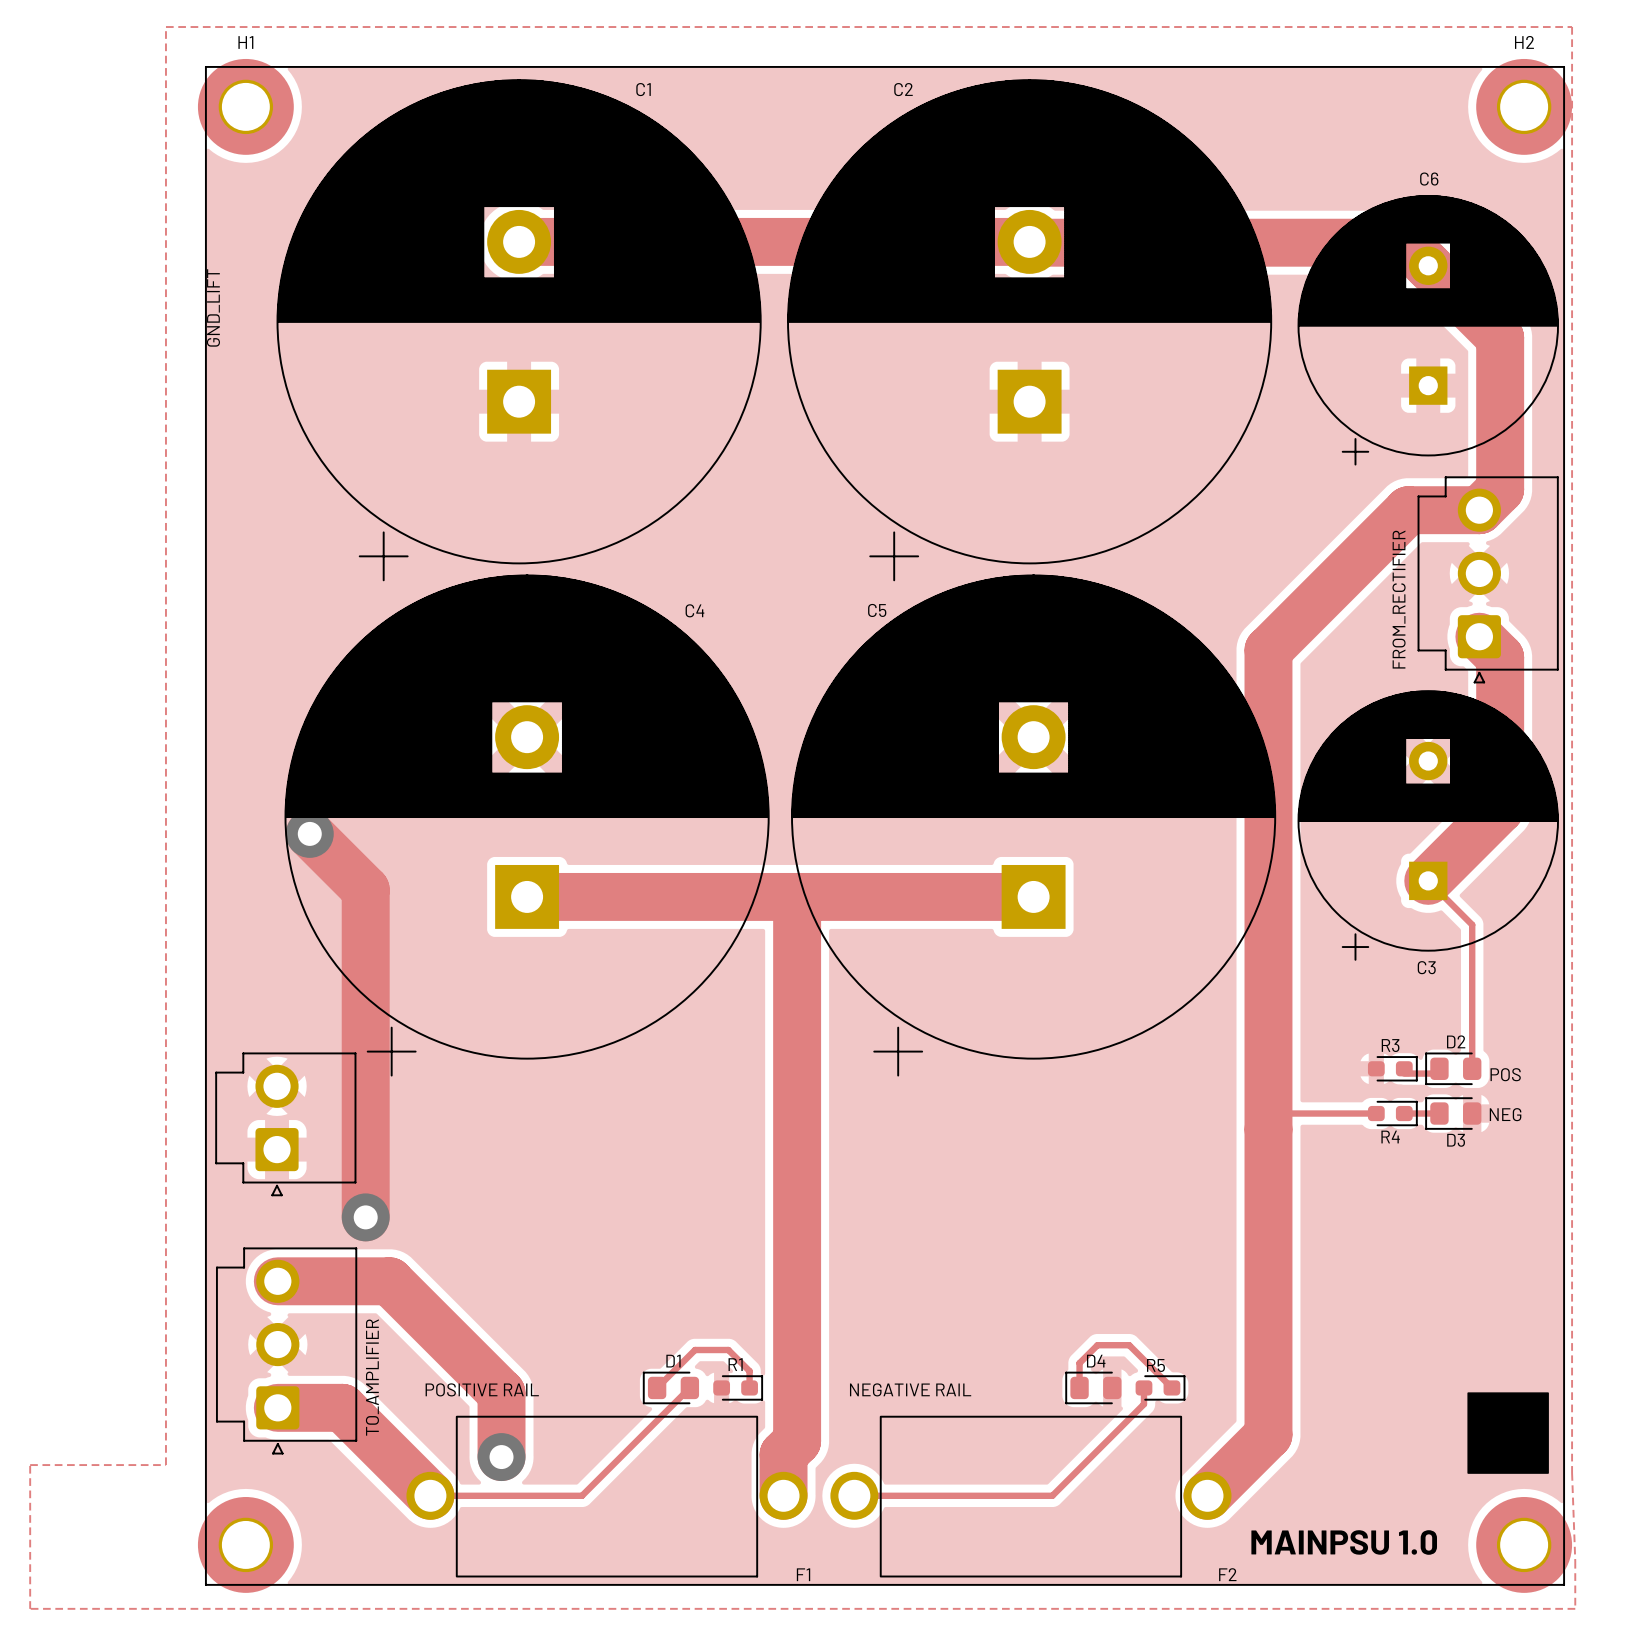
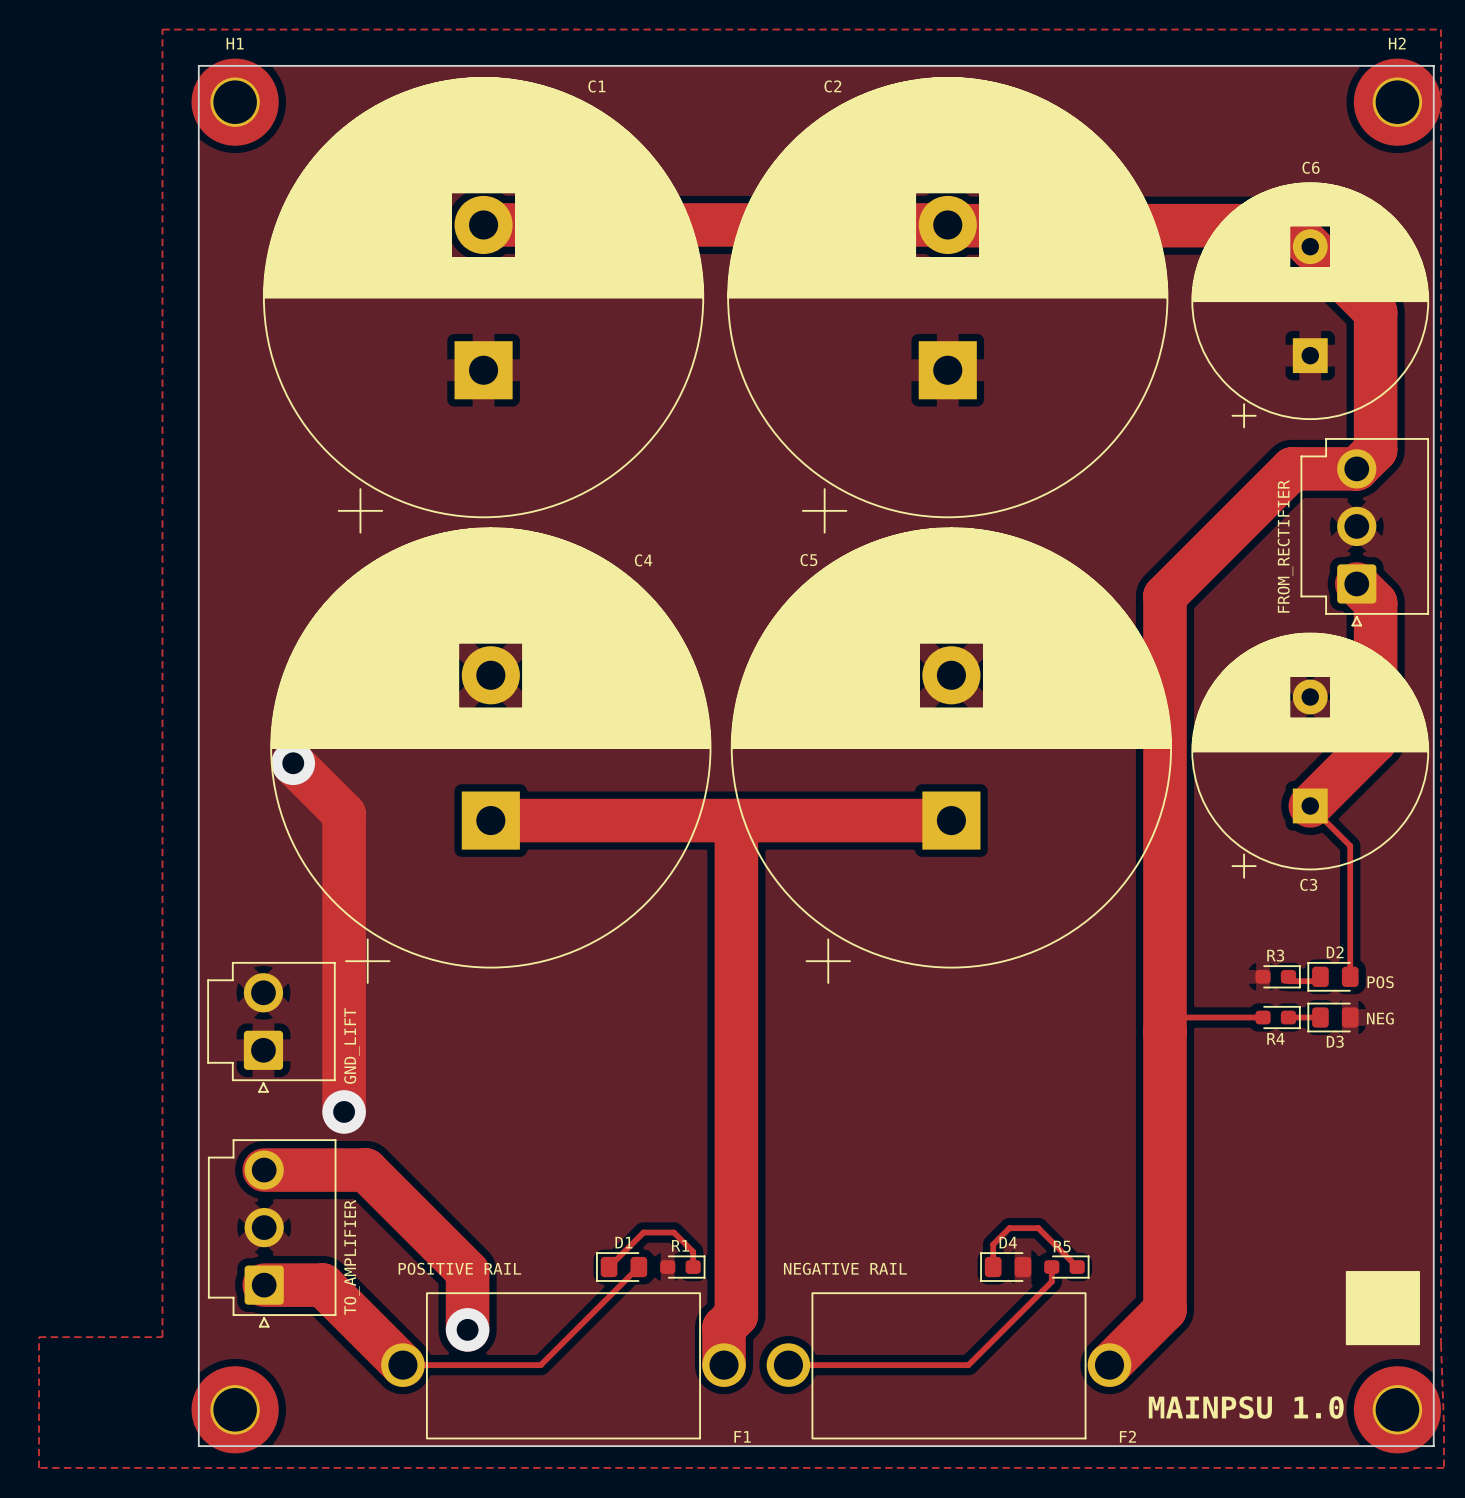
text: GND_LIFT (213, 307) -> none
text: none -> GND_LIFT (351, 1045)

